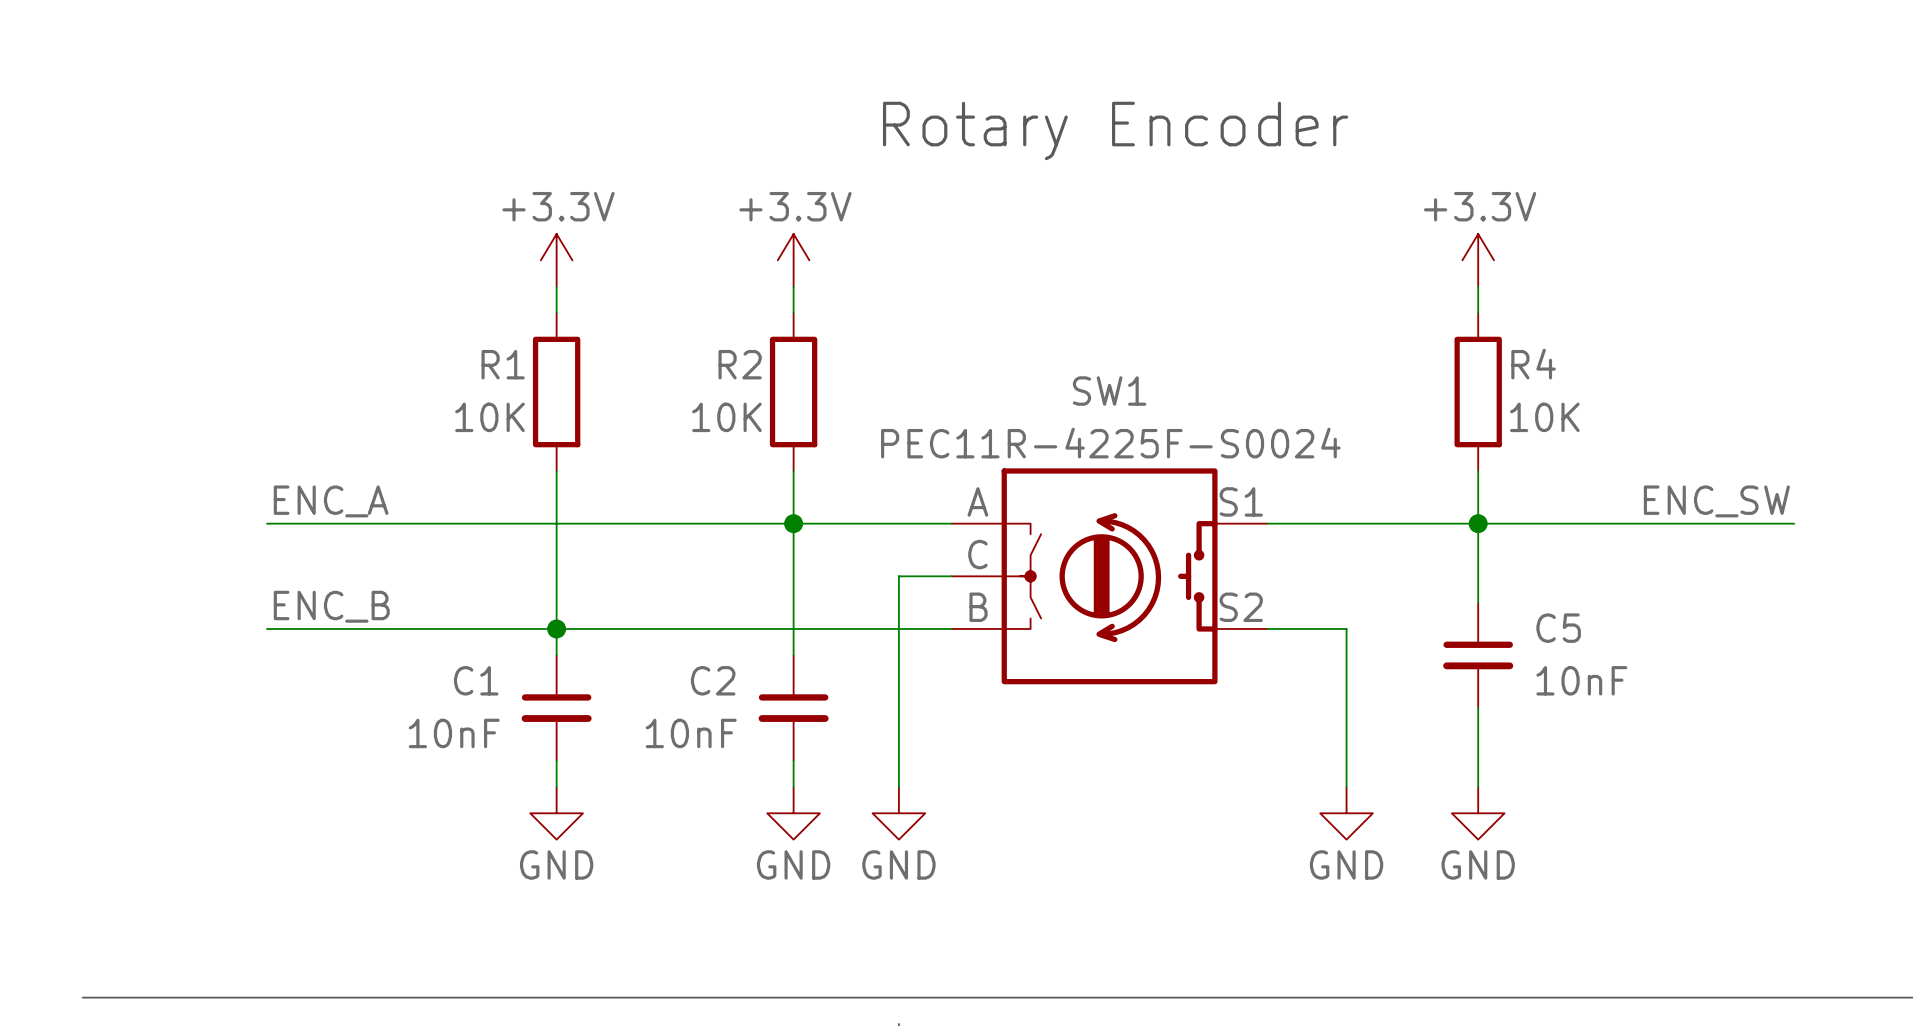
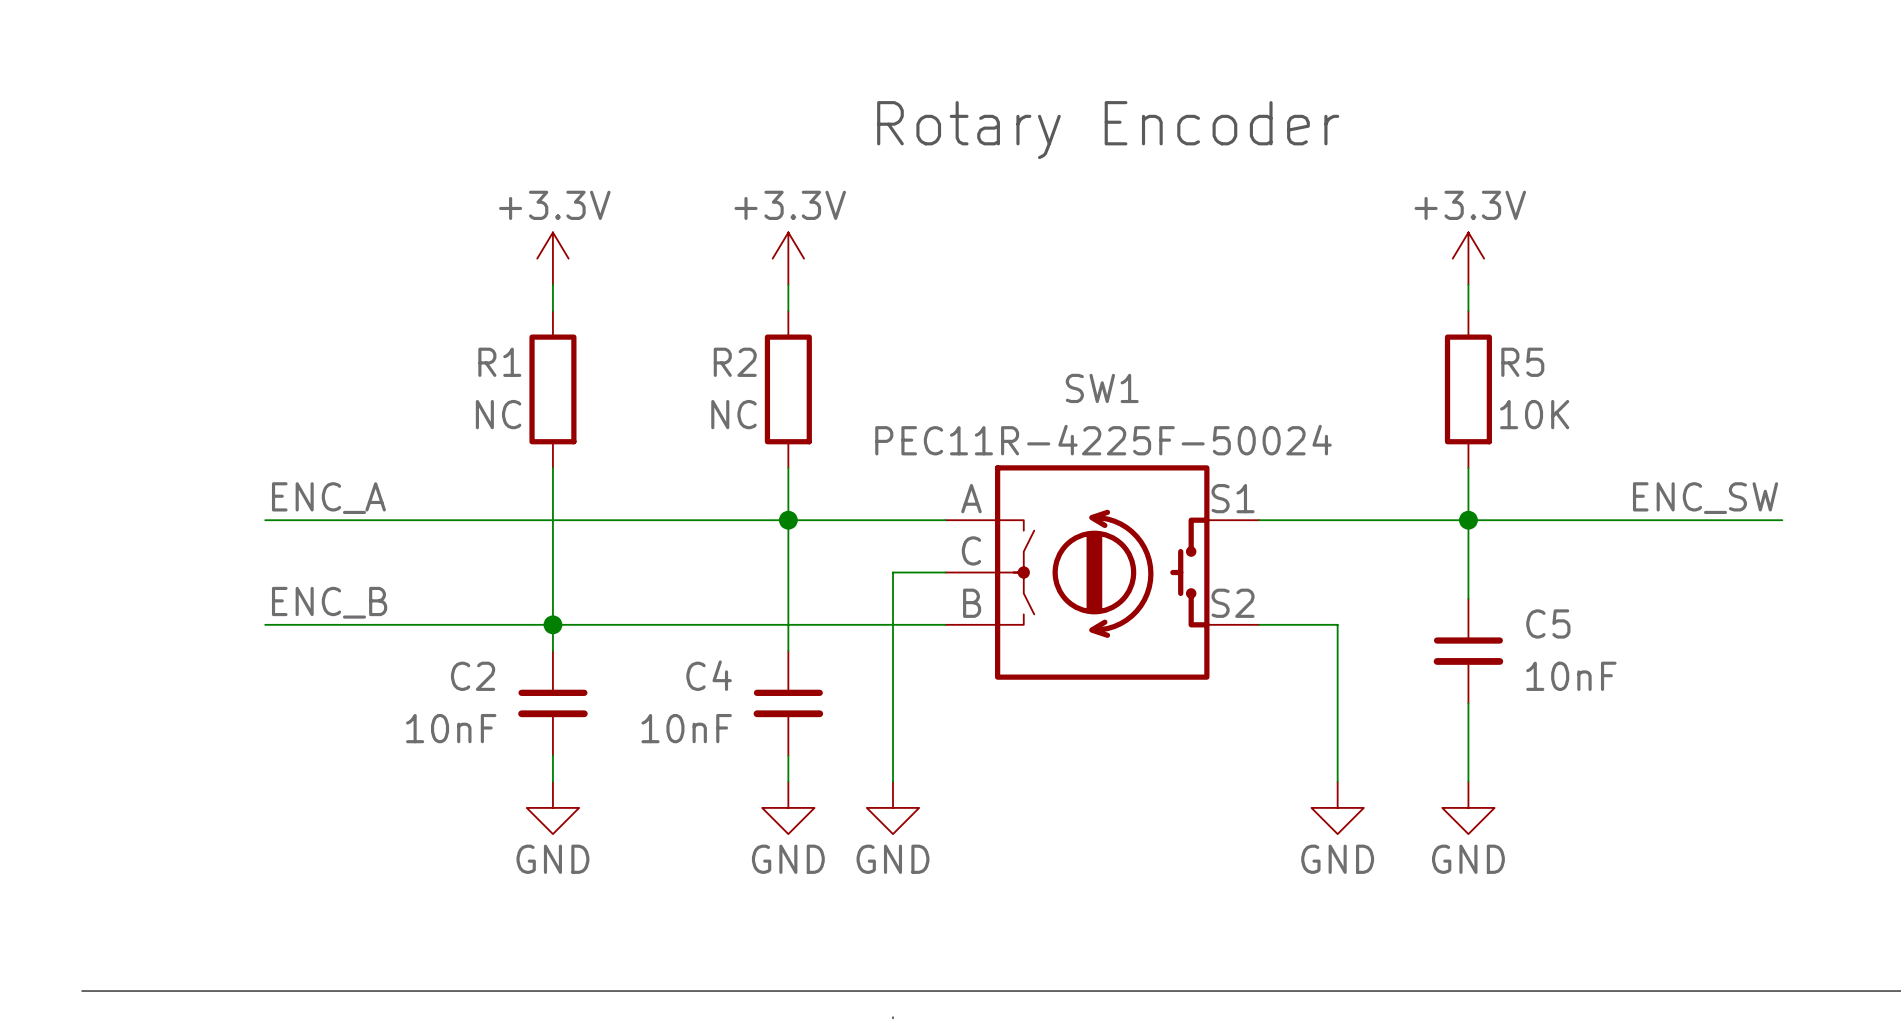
R4 name: R4 (1533, 364) -> R5 (1522, 362)
R1 value: 10K (489, 417) -> NC (498, 414)
R2 value: 10K (726, 417) -> NC (733, 414)
SW1 value: PEC11R-4225F-S0024 (1110, 443) -> PEC11R-4225F-50024 (1103, 440)
C1 name: C1 (476, 680) -> C2 (473, 676)
C2 name: C2 (713, 680) -> C4 (709, 675)

